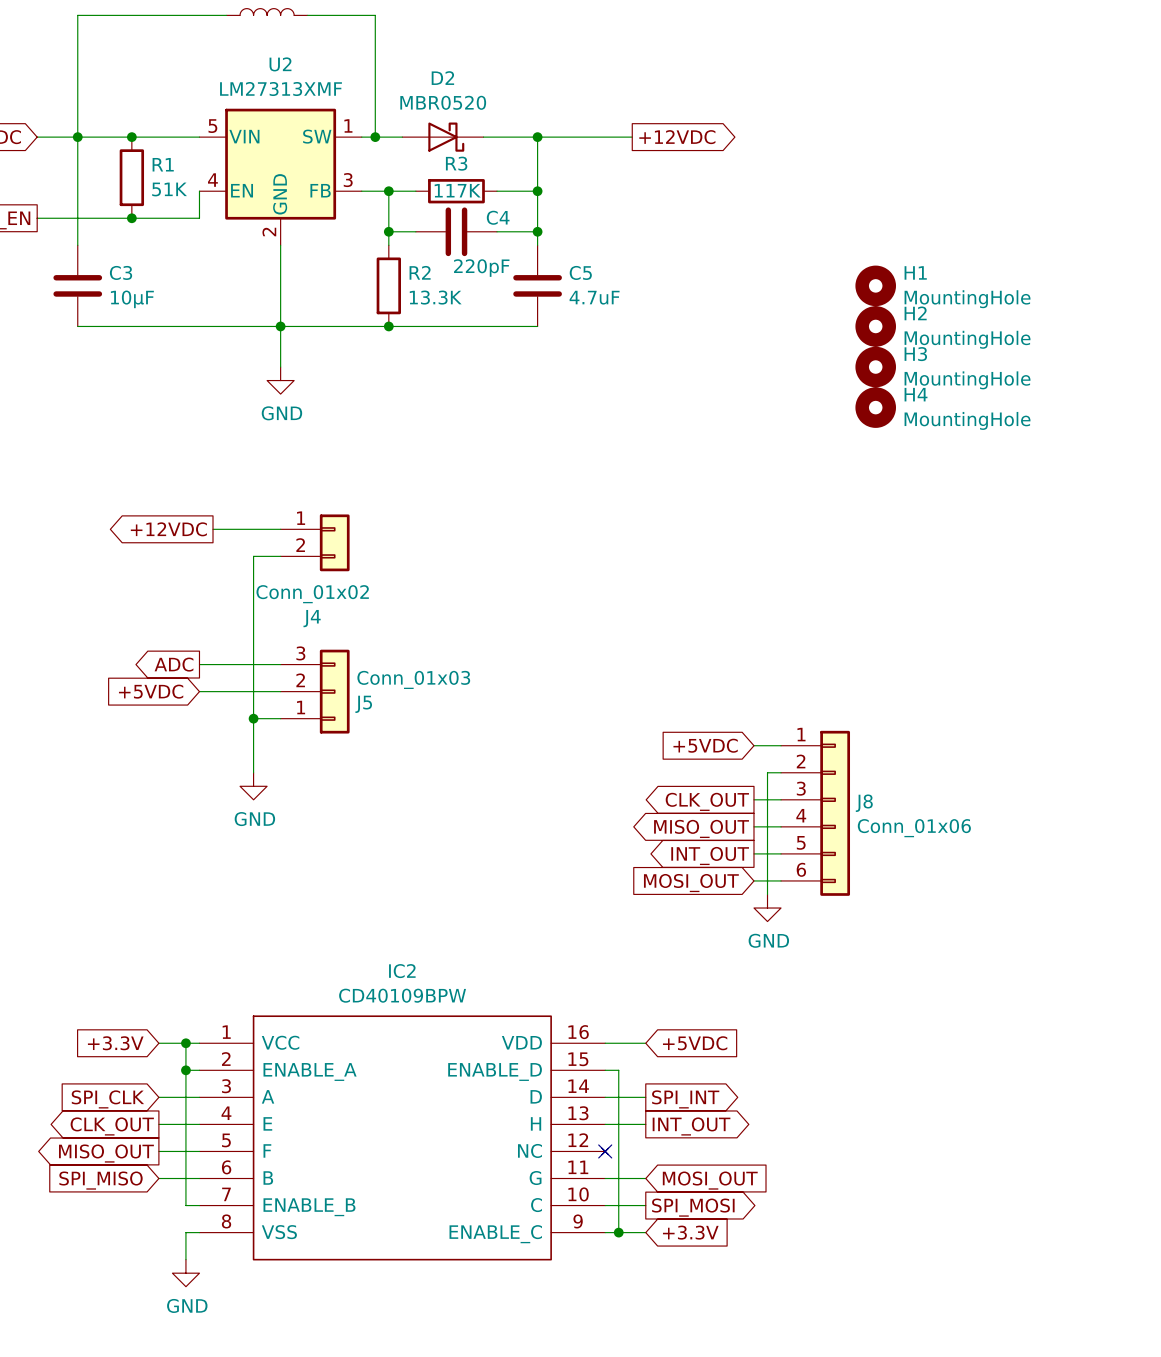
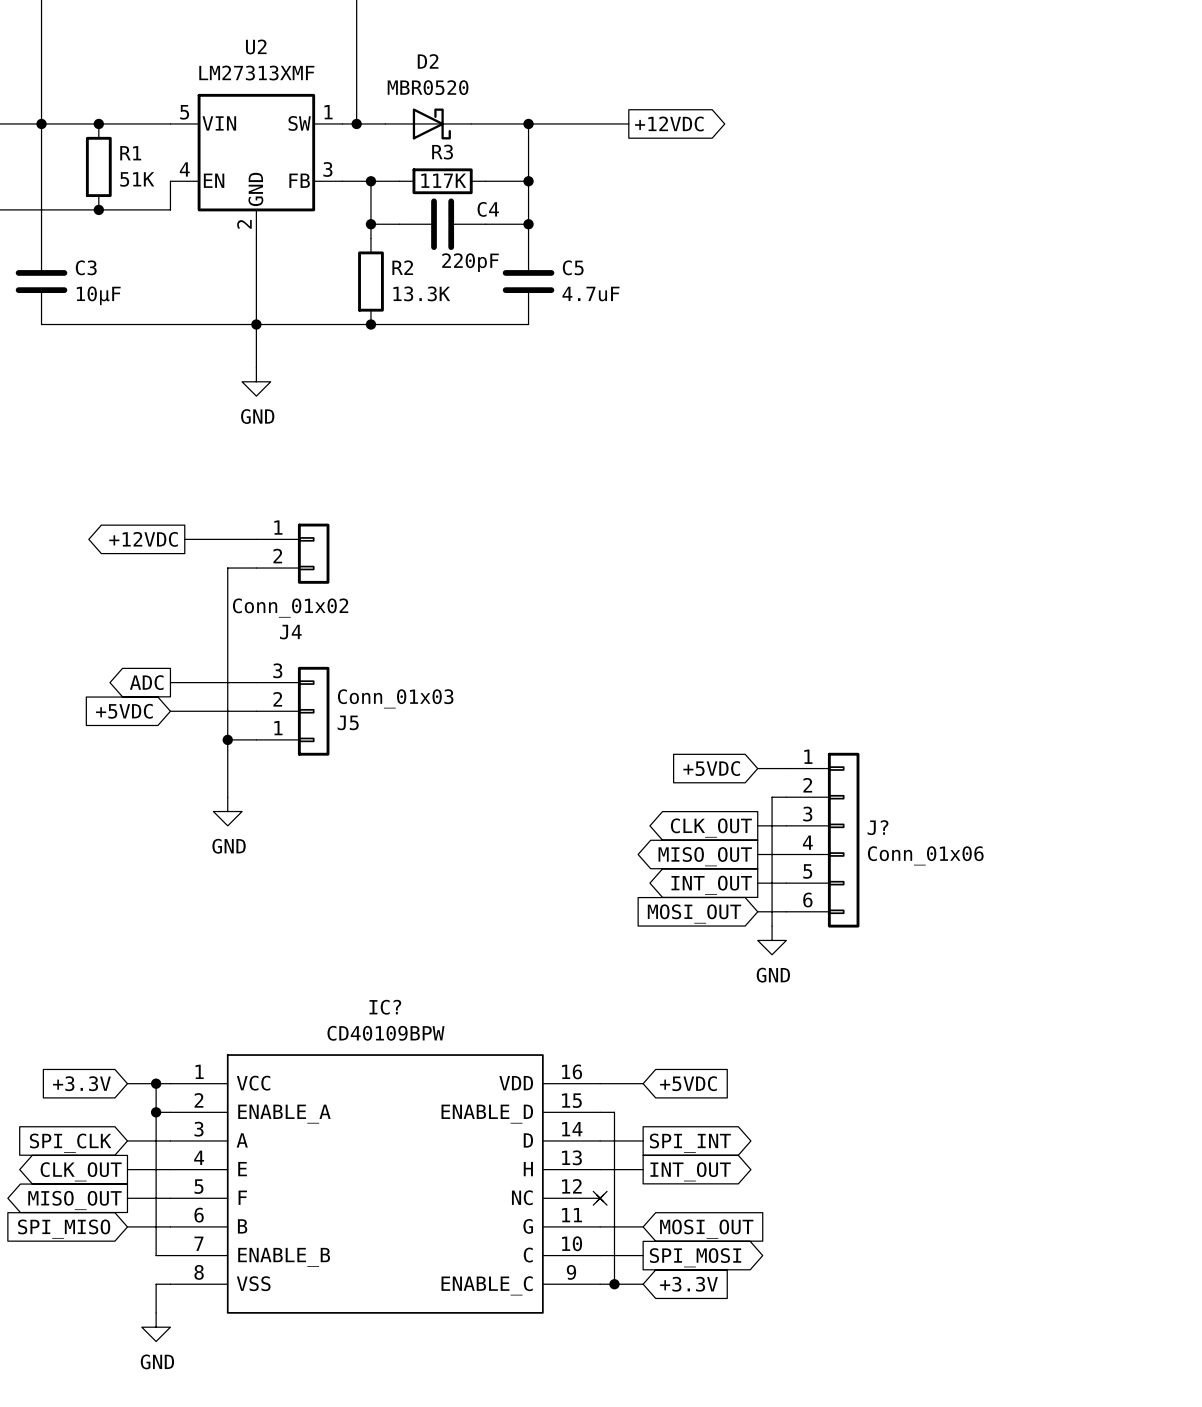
H1: MountingHole (875, 285) -> none
H2: MountingHole (875, 326) -> none
H3: MountingHole (875, 367) -> none
H4: MountingHole (875, 407) -> none
J8 name: J8 (864, 803) -> J? (878, 827)
IC2 name: IC2 (402, 971) -> IC? (385, 1007)

